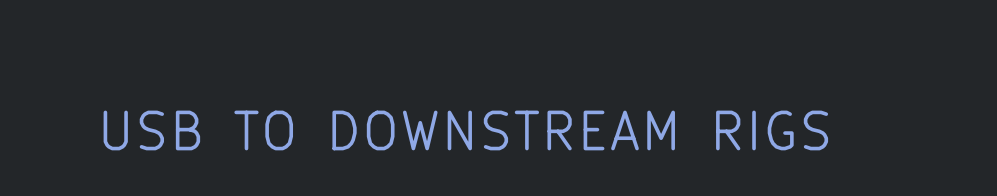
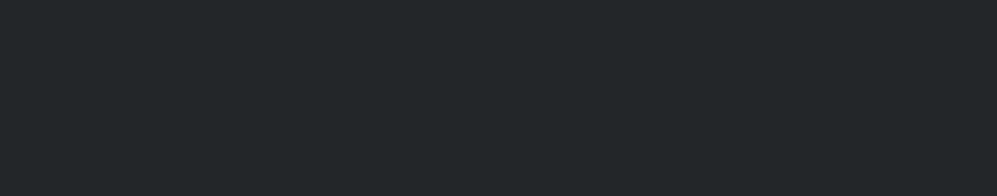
text: USB TO DOWNSTREAM RIGS (465, 130) -> none

